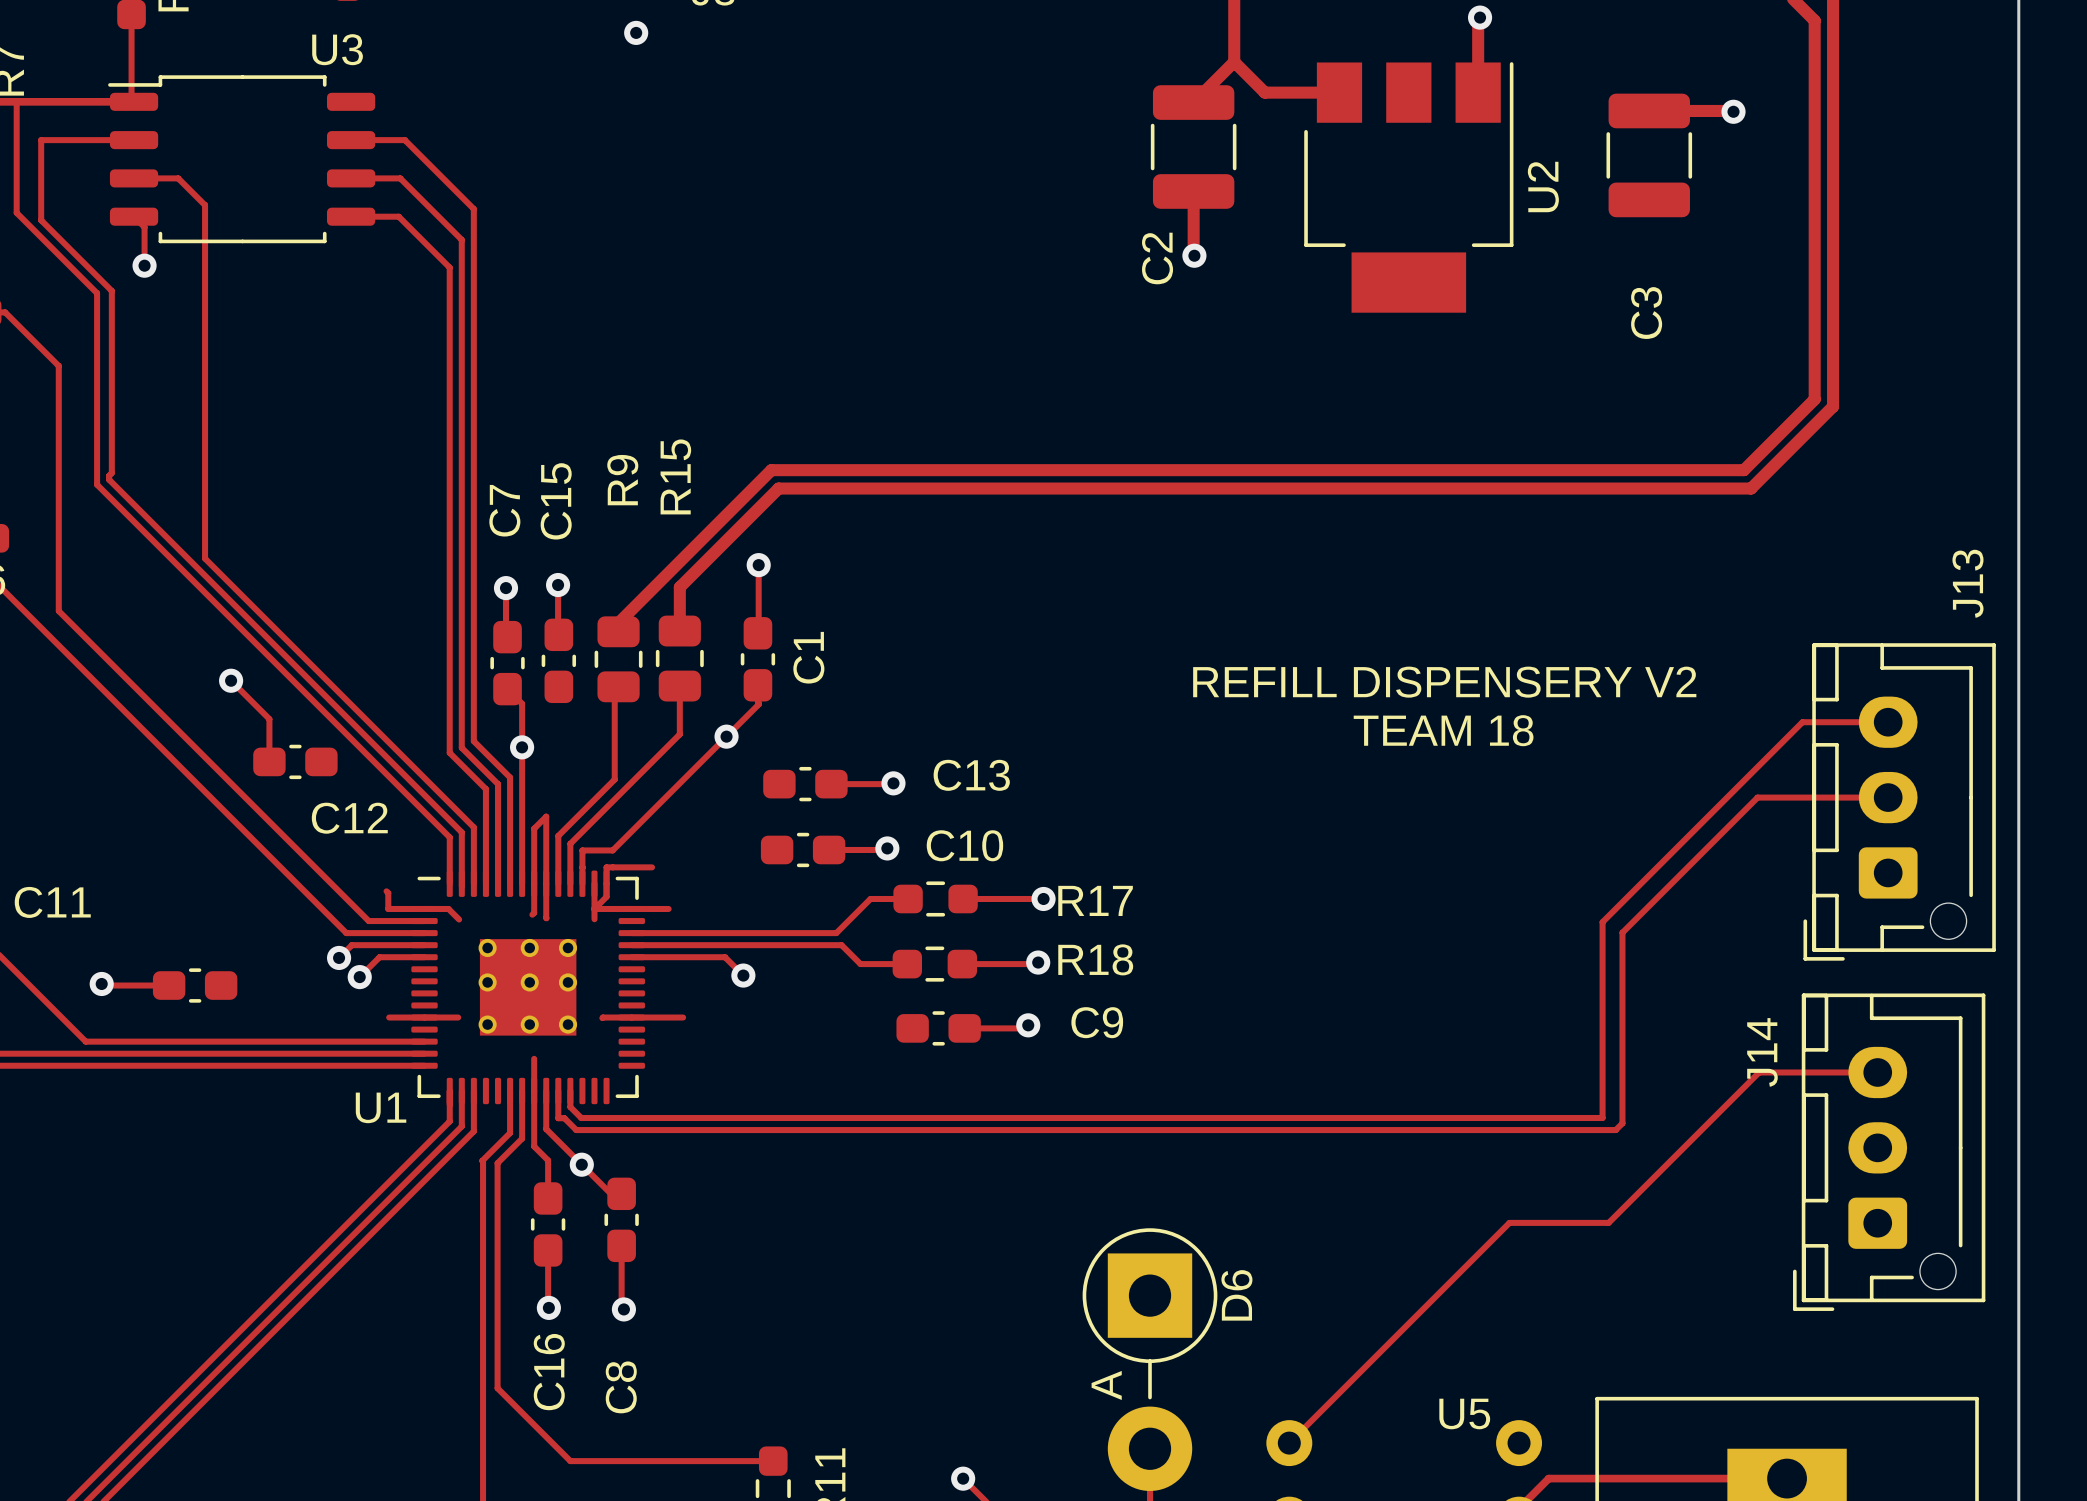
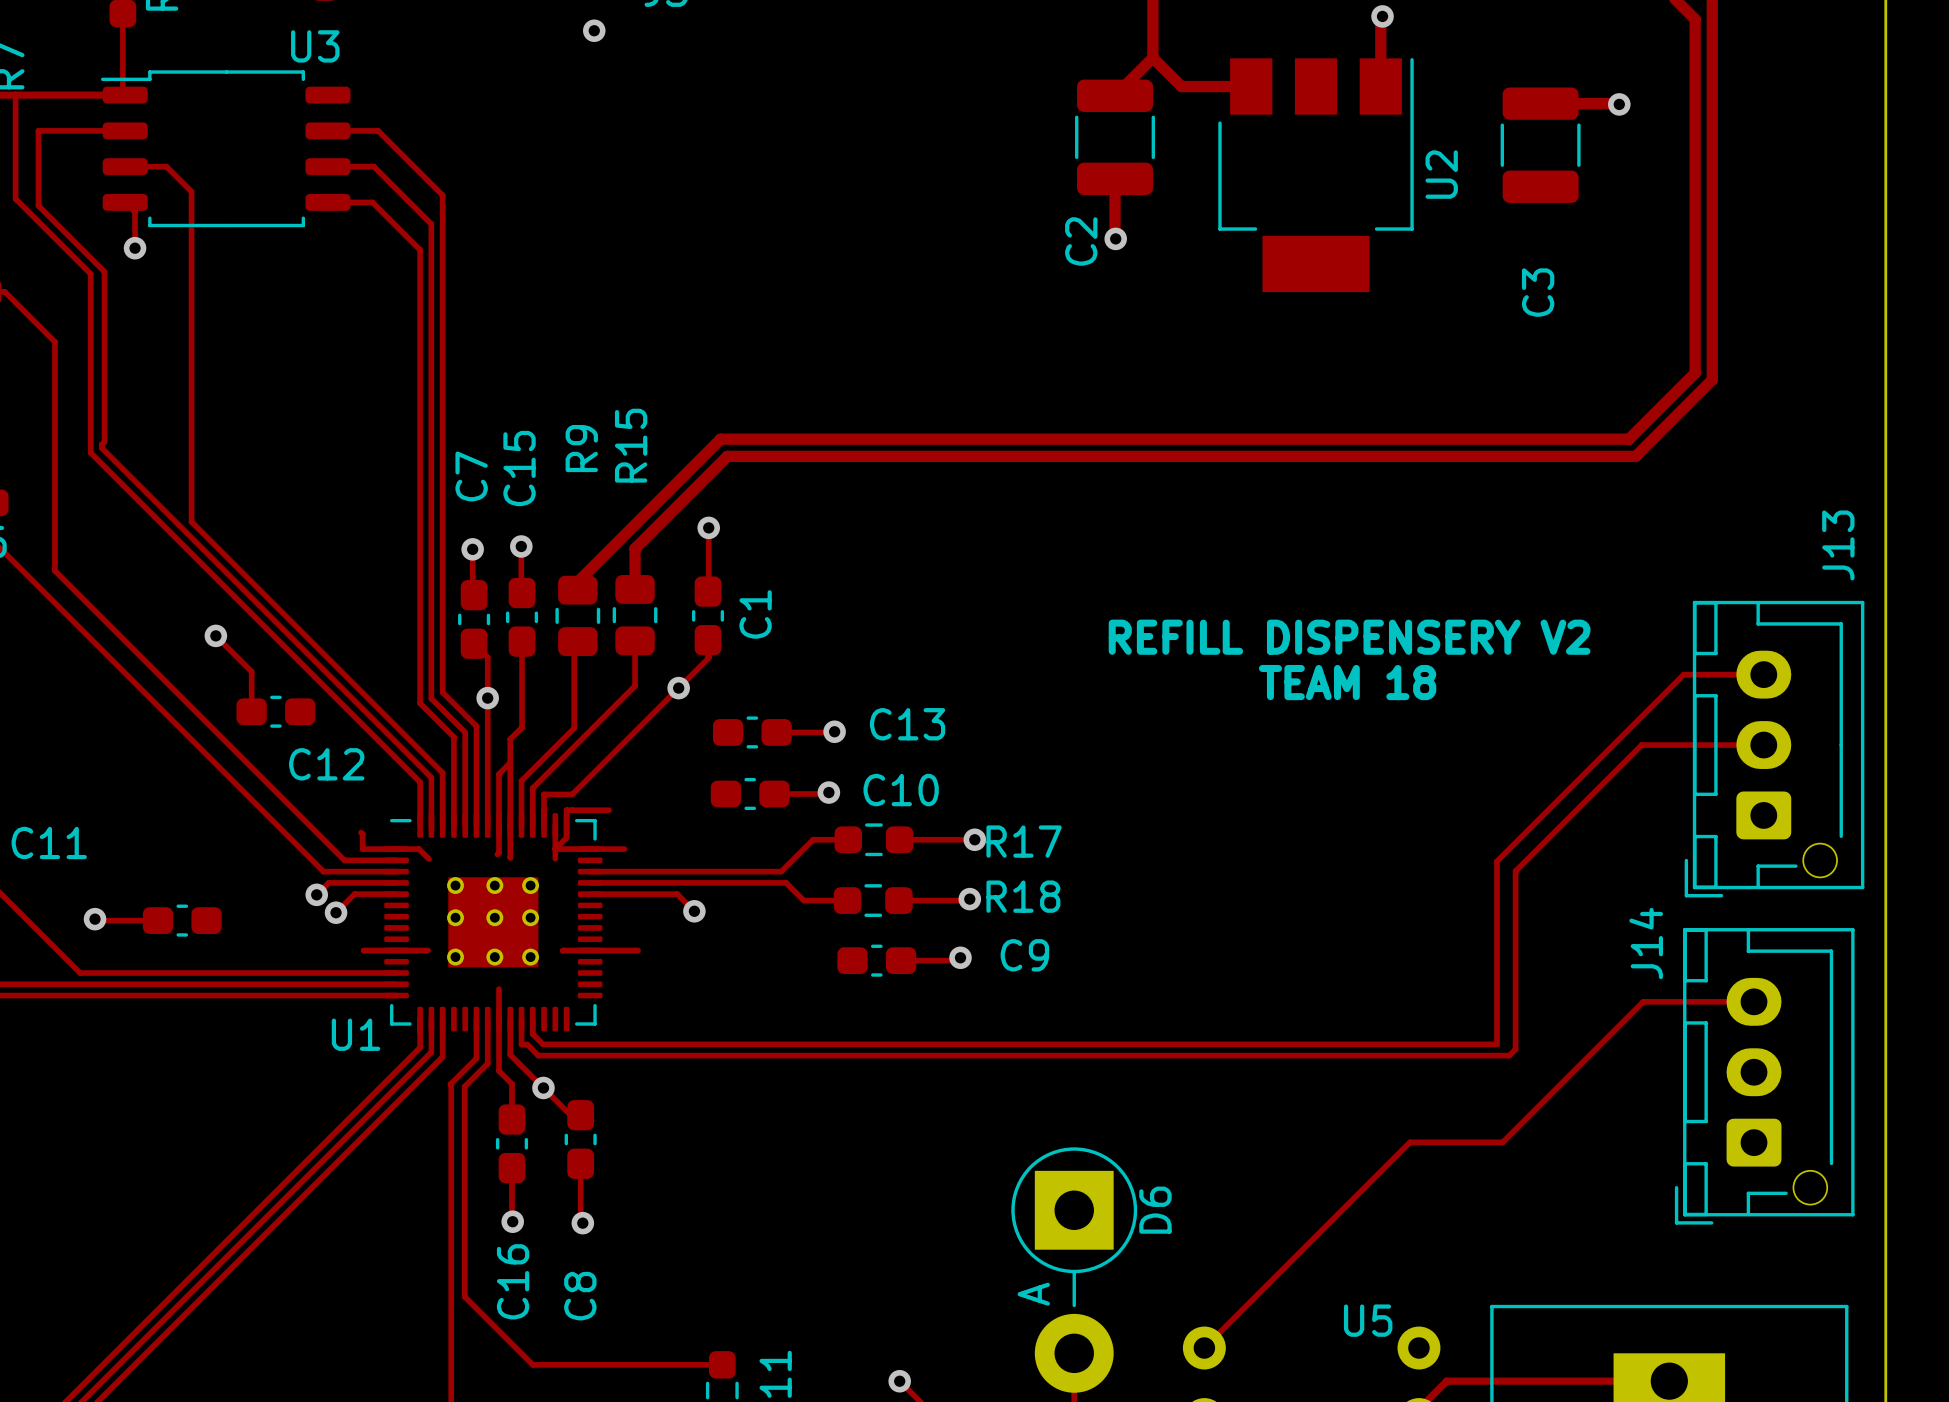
track: none -> (522, 641) (522, 727) (510, 739) (510, 762)
J14 name position: J14 (1762, 1052) -> J14 (1646, 943)

